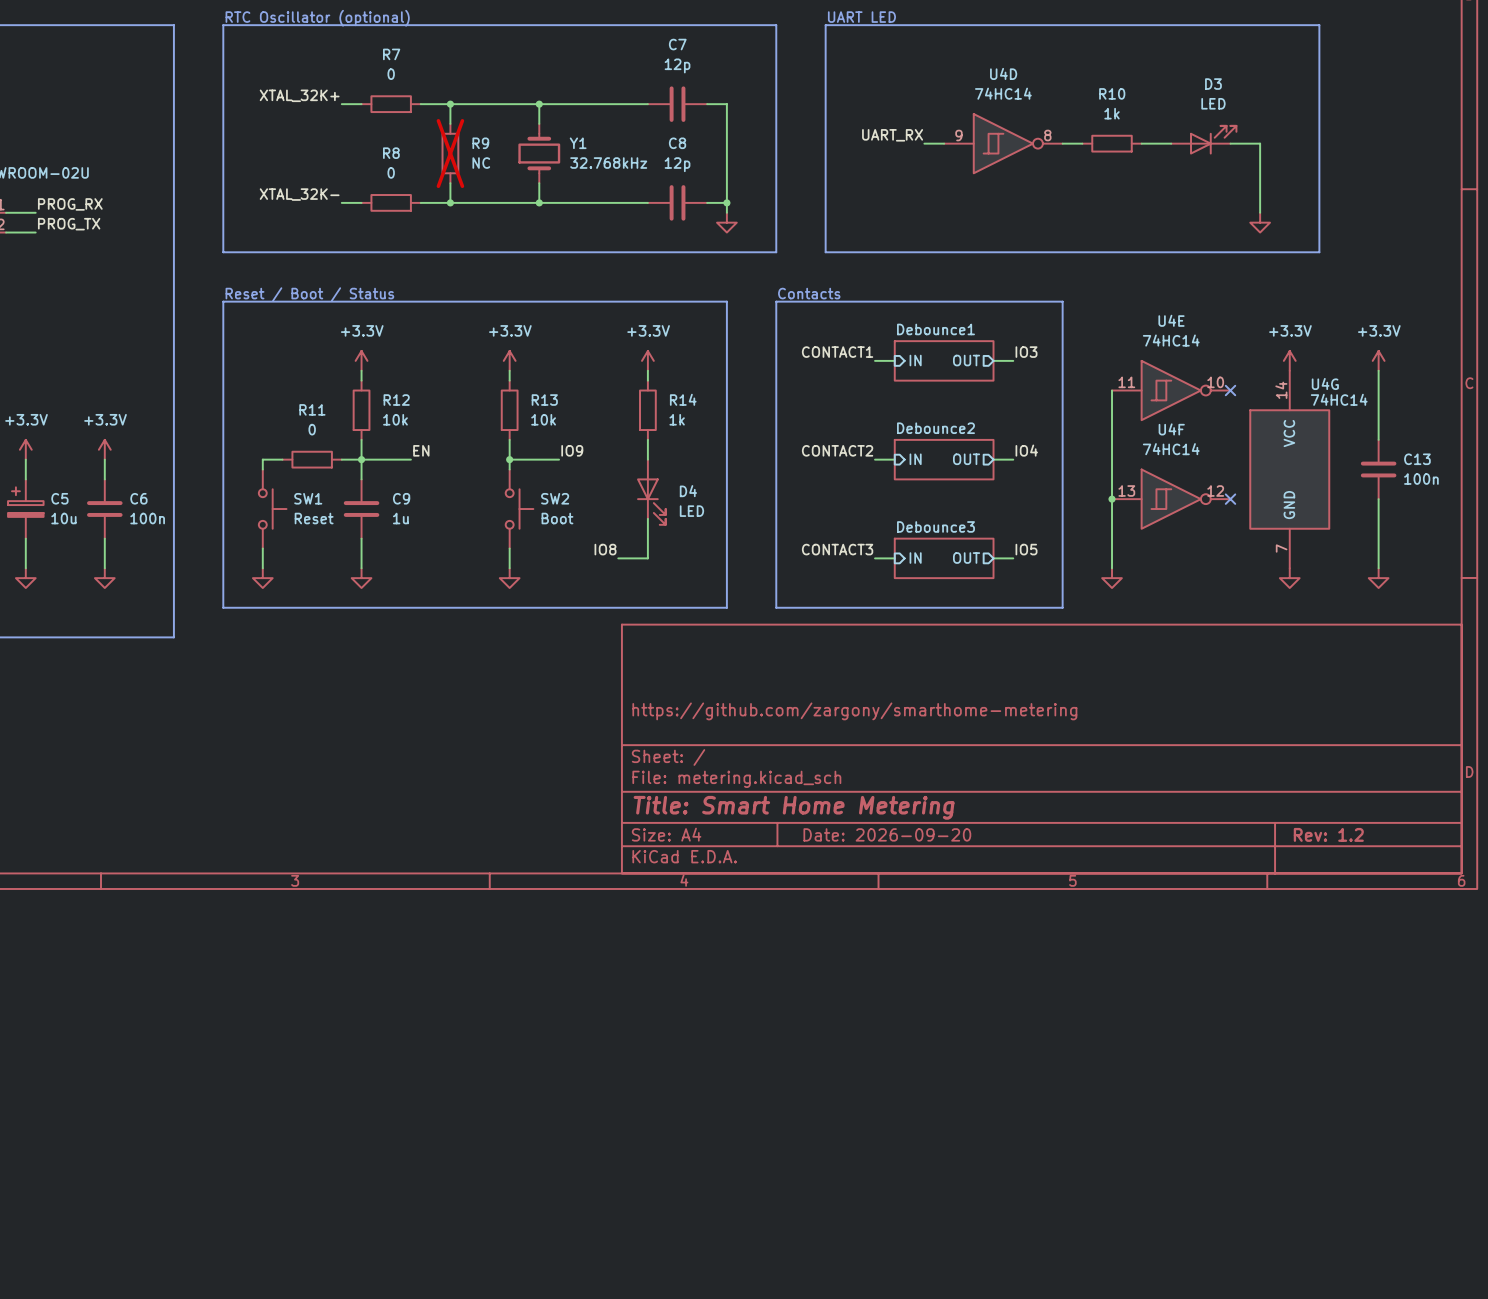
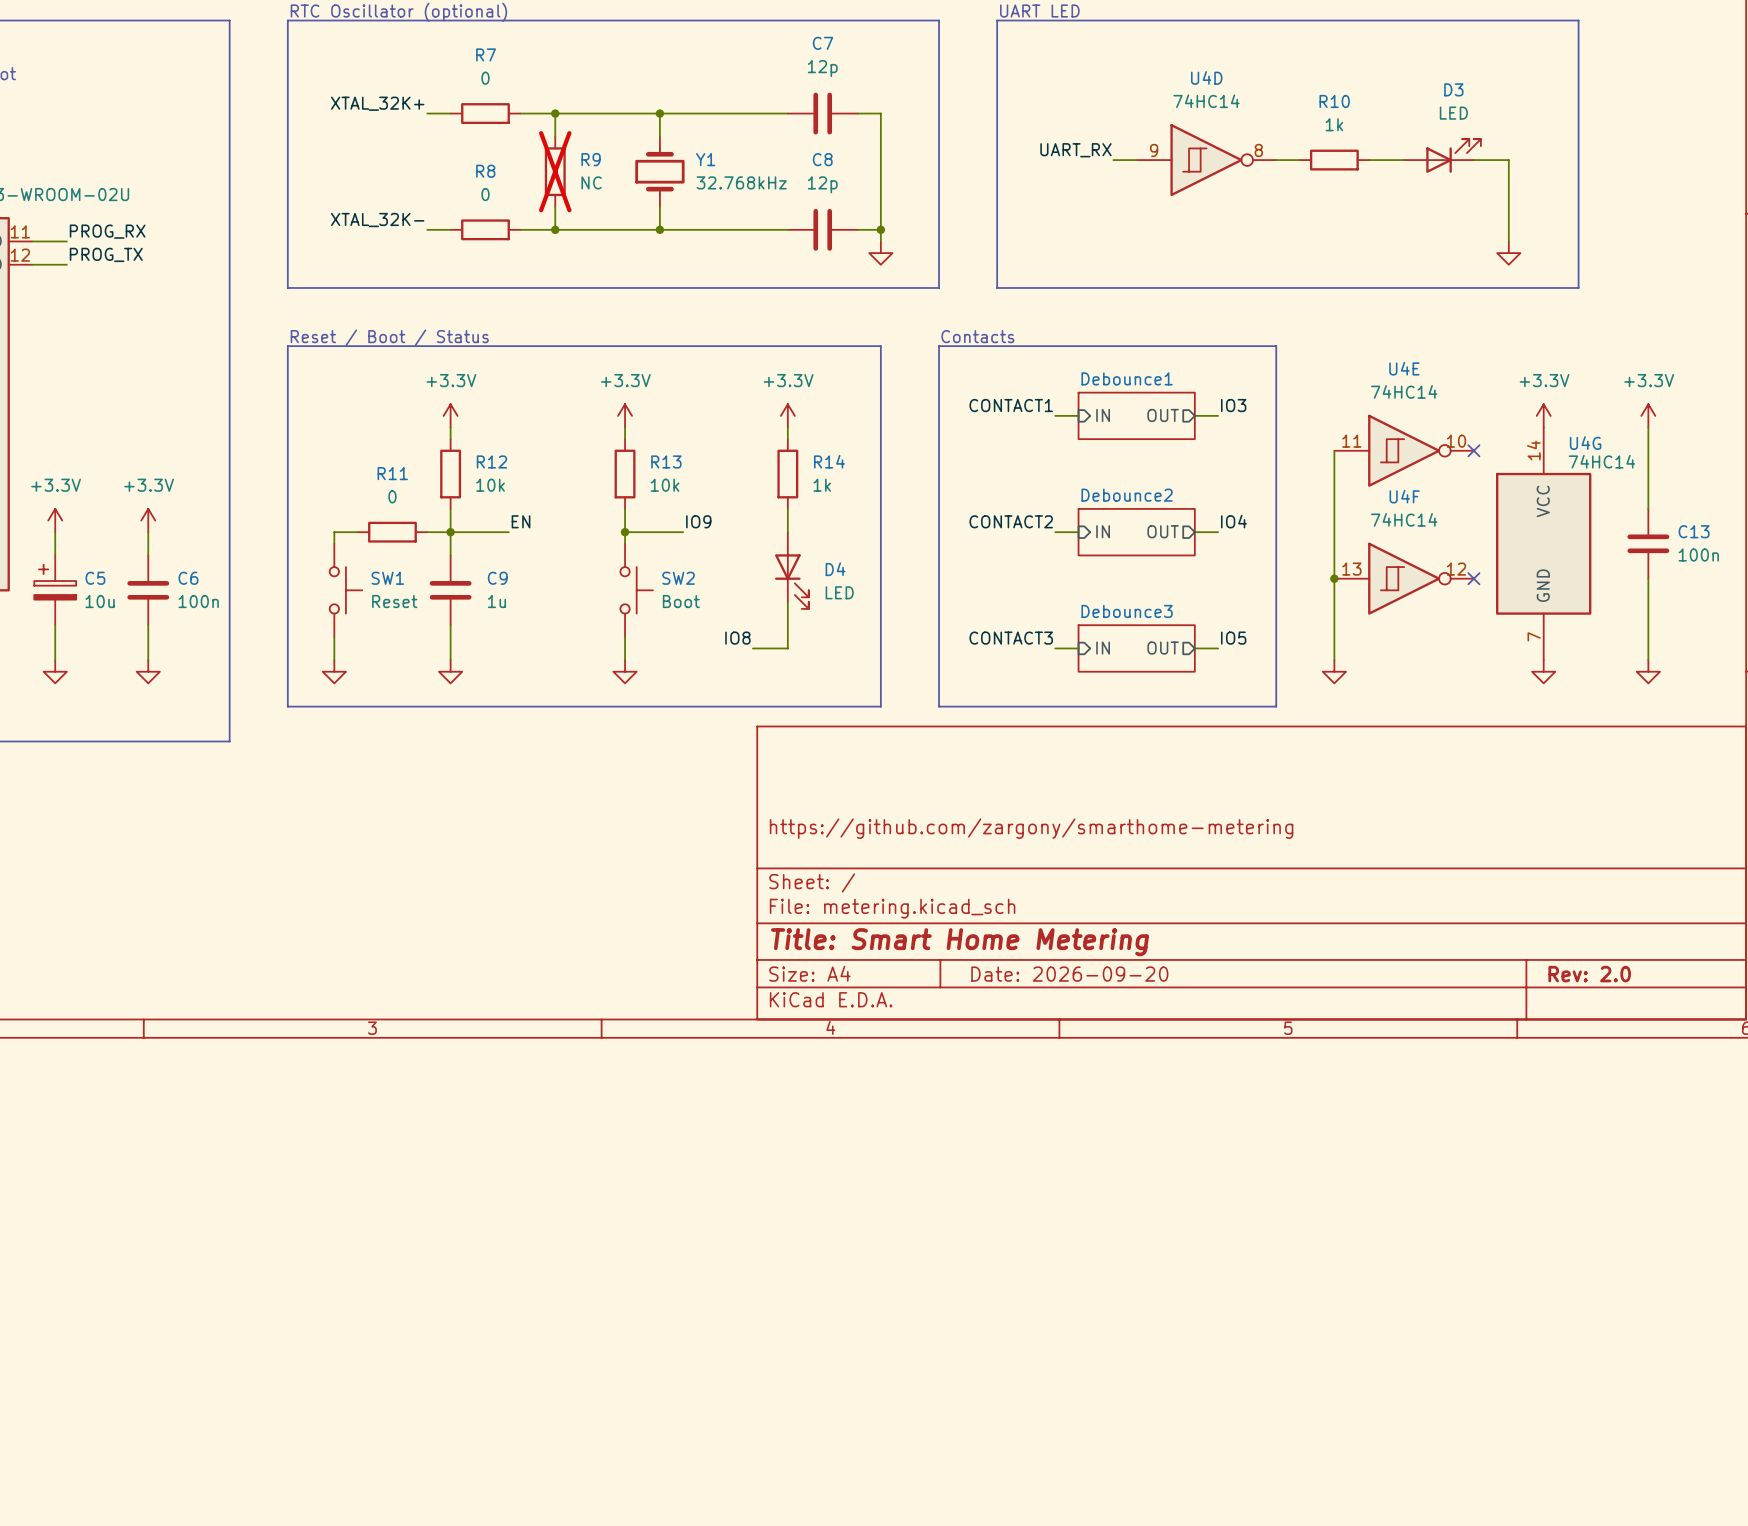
title block: Rev: 1.2 (1328, 834) -> Rev: 2.0 (1589, 974)

